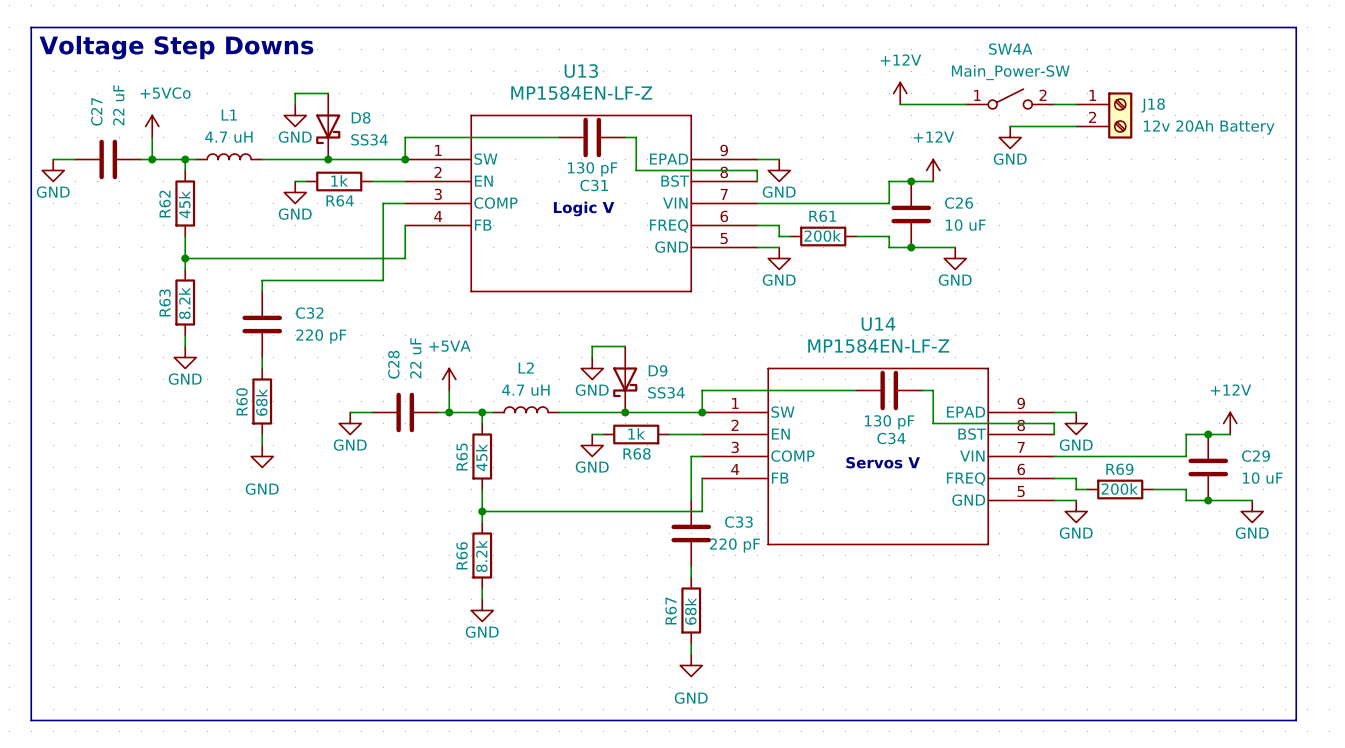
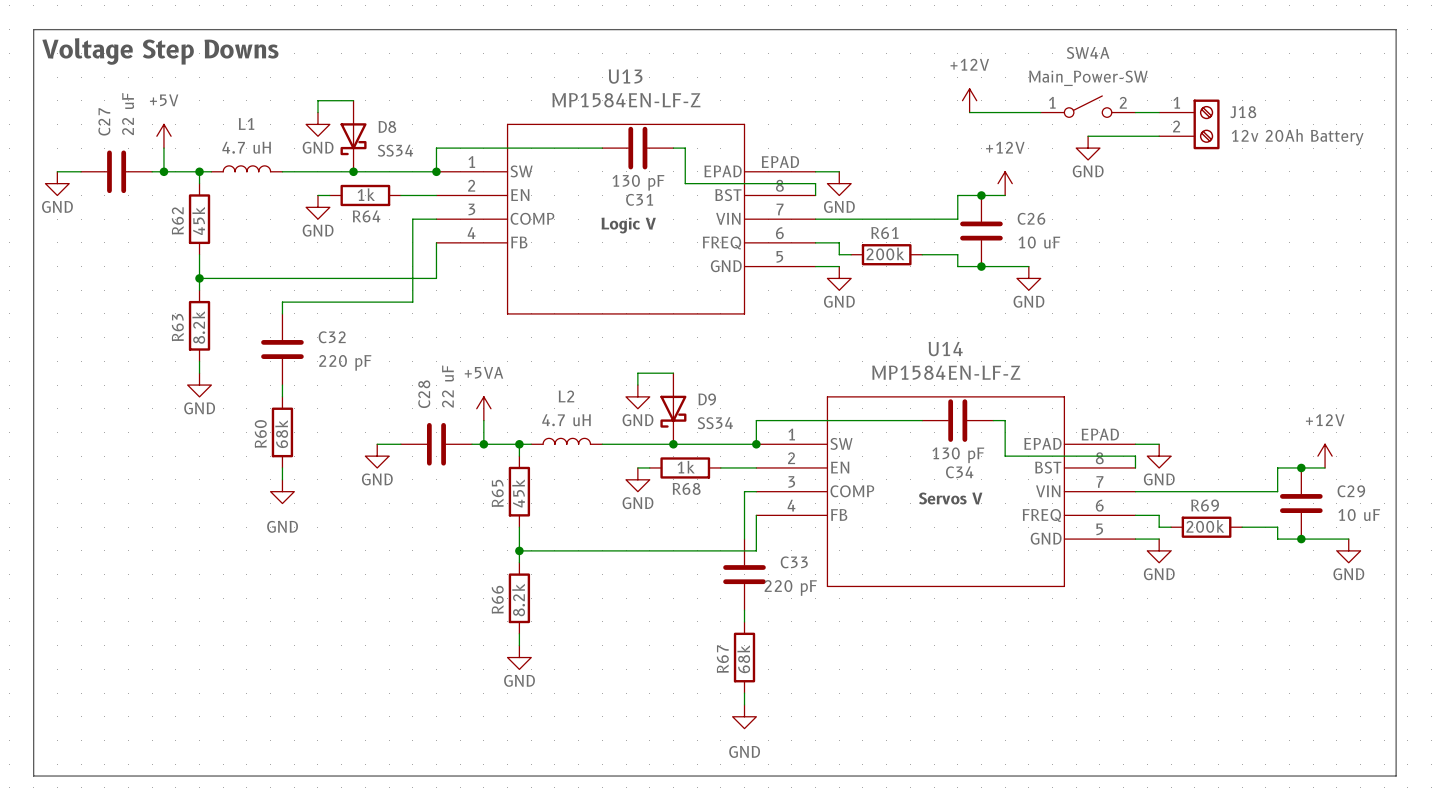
power symbol: +5VCo (152, 126) -> +5V (163, 136)
U13 pin number: 9 (724, 150) -> EPAD (780, 162)
U14 pin number: 9 (1021, 403) -> EPAD (1100, 434)

